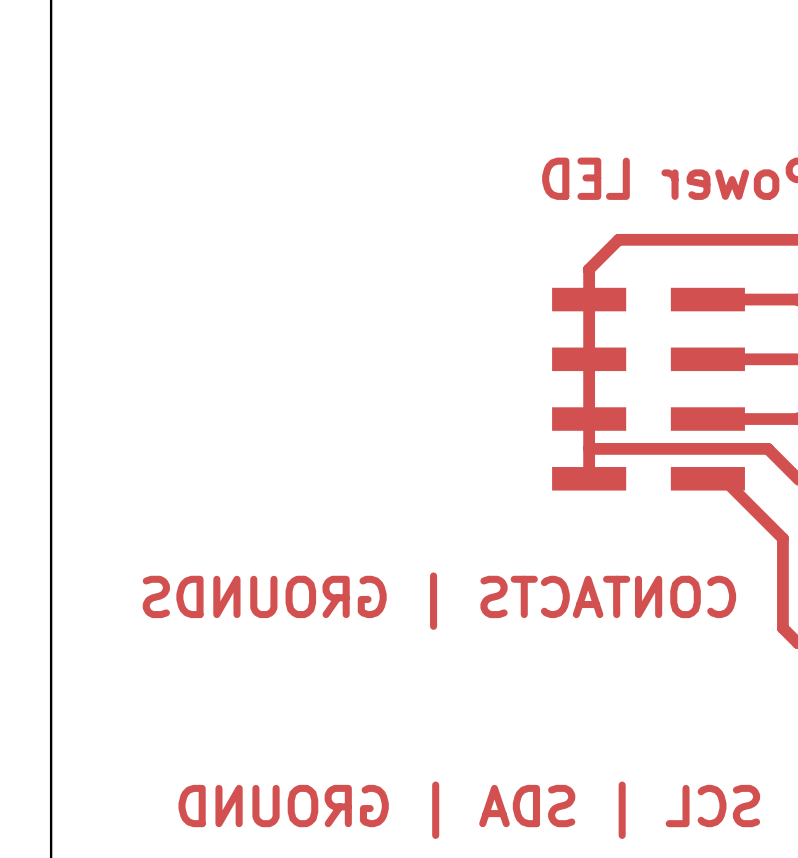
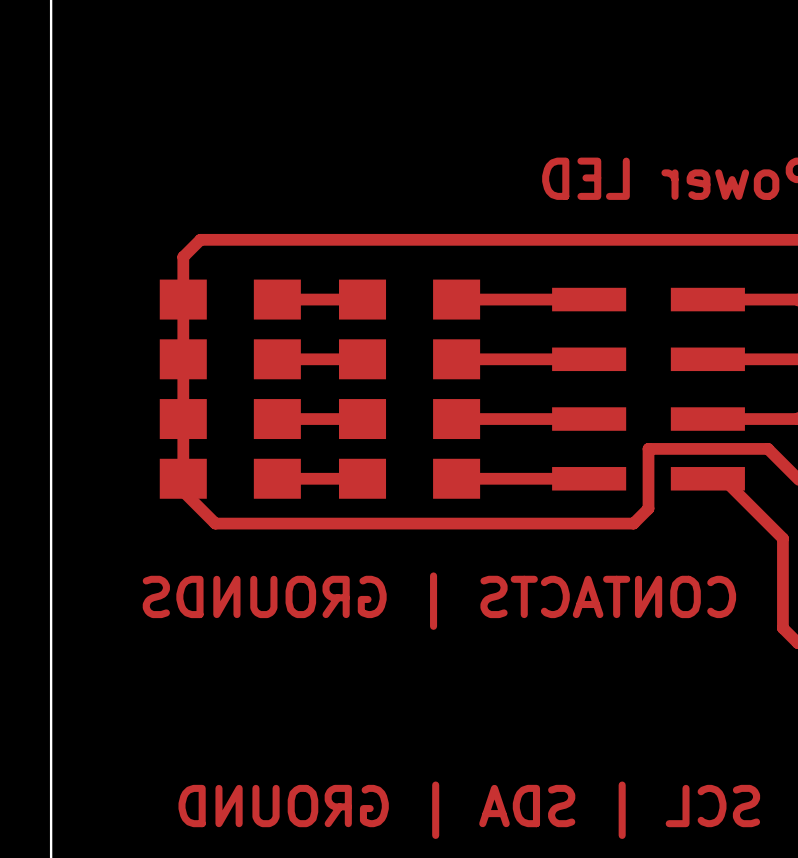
top track: (618, 239) (588, 269) (589, 478) -> (618, 239) (200, 239) (183, 256) (183, 491) (215, 523) (633, 523) (648, 508) (648, 448)
part: none -> (230, 299)
top track: none -> (362, 299) (277, 299)
part: none -> (409, 299)
top track: none -> (589, 299) (456, 299)
part: none -> (230, 359)
top track: none -> (362, 359) (277, 359)
part: none -> (409, 359)
top track: none -> (589, 359) (456, 359)
part: none -> (230, 419)
top track: none -> (362, 419) (277, 419)
part: none -> (409, 419)
top track: none -> (589, 419) (456, 419)
top track: (589, 448) (648, 448) -> none
part: none -> (230, 478)
top track: none -> (362, 478) (277, 478)
part: none -> (409, 478)
top track: none -> (589, 478) (456, 478)

